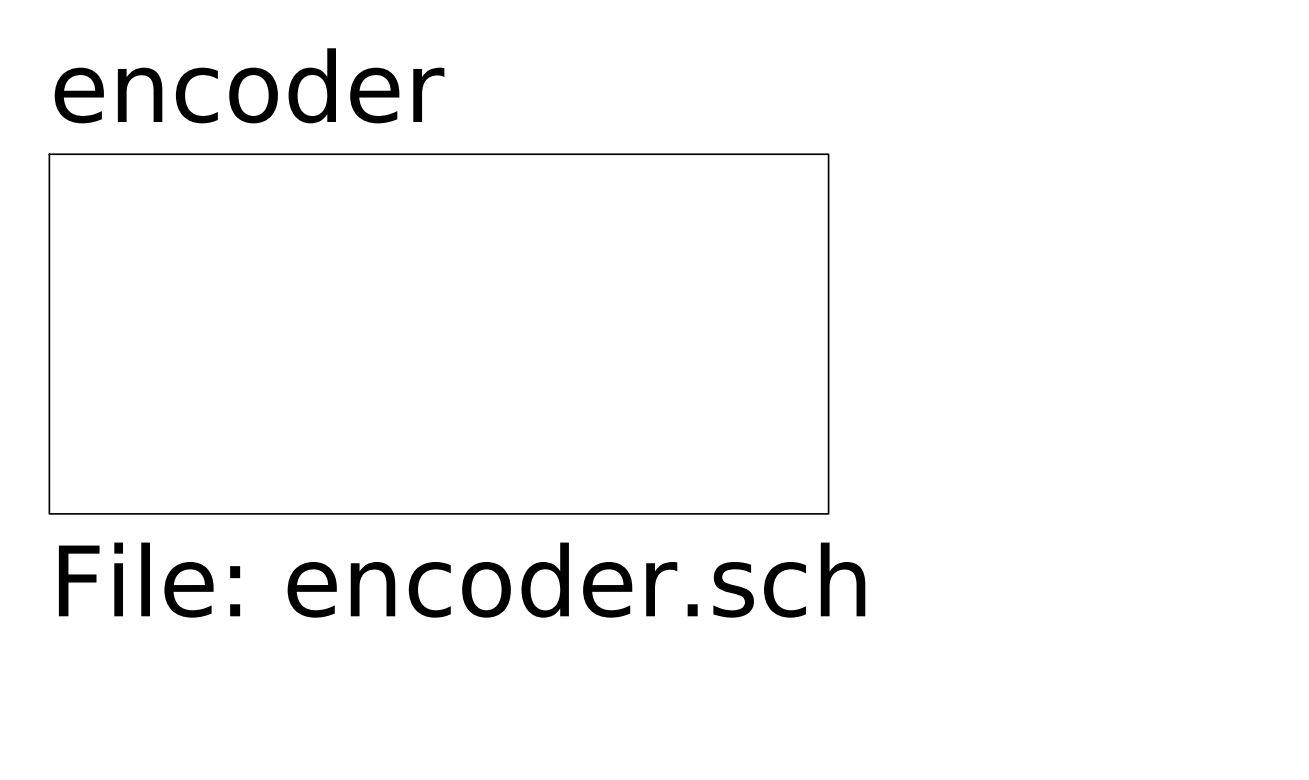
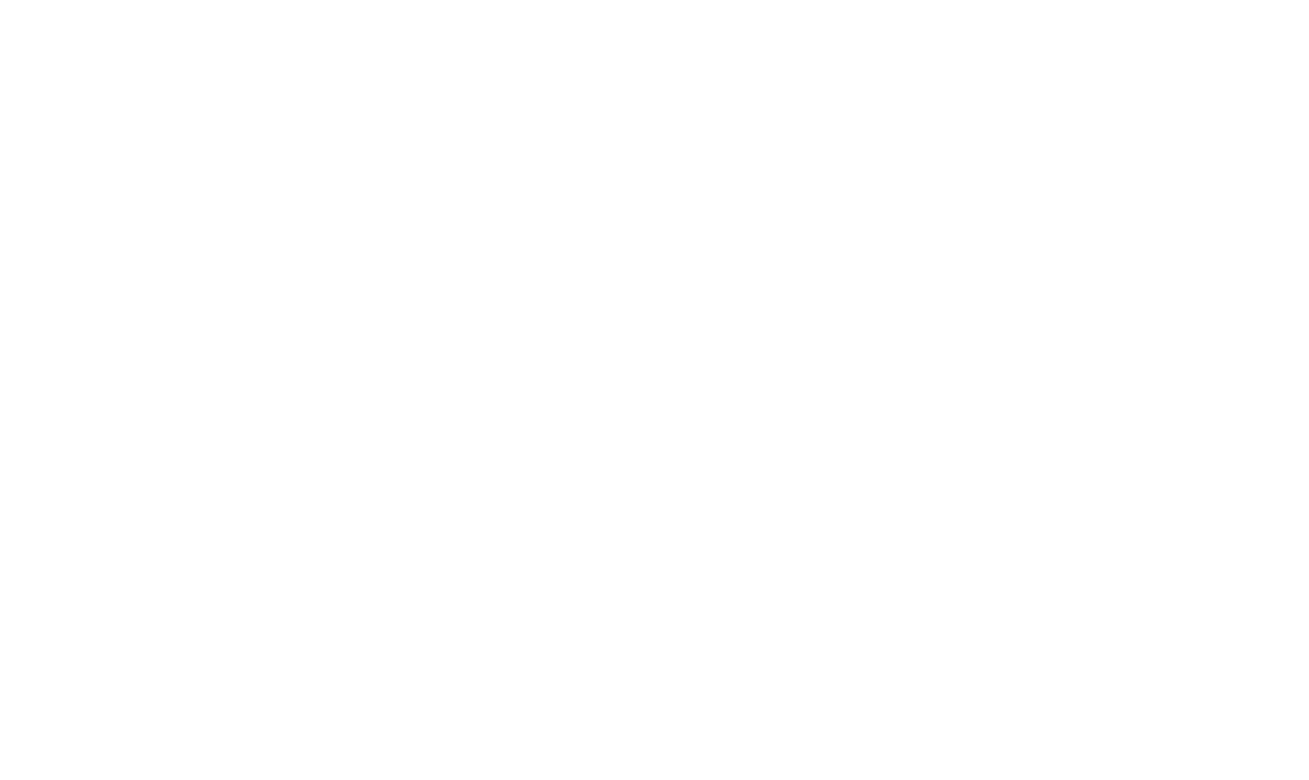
sheet encoder: File: encoder.sch (438, 334) -> none

